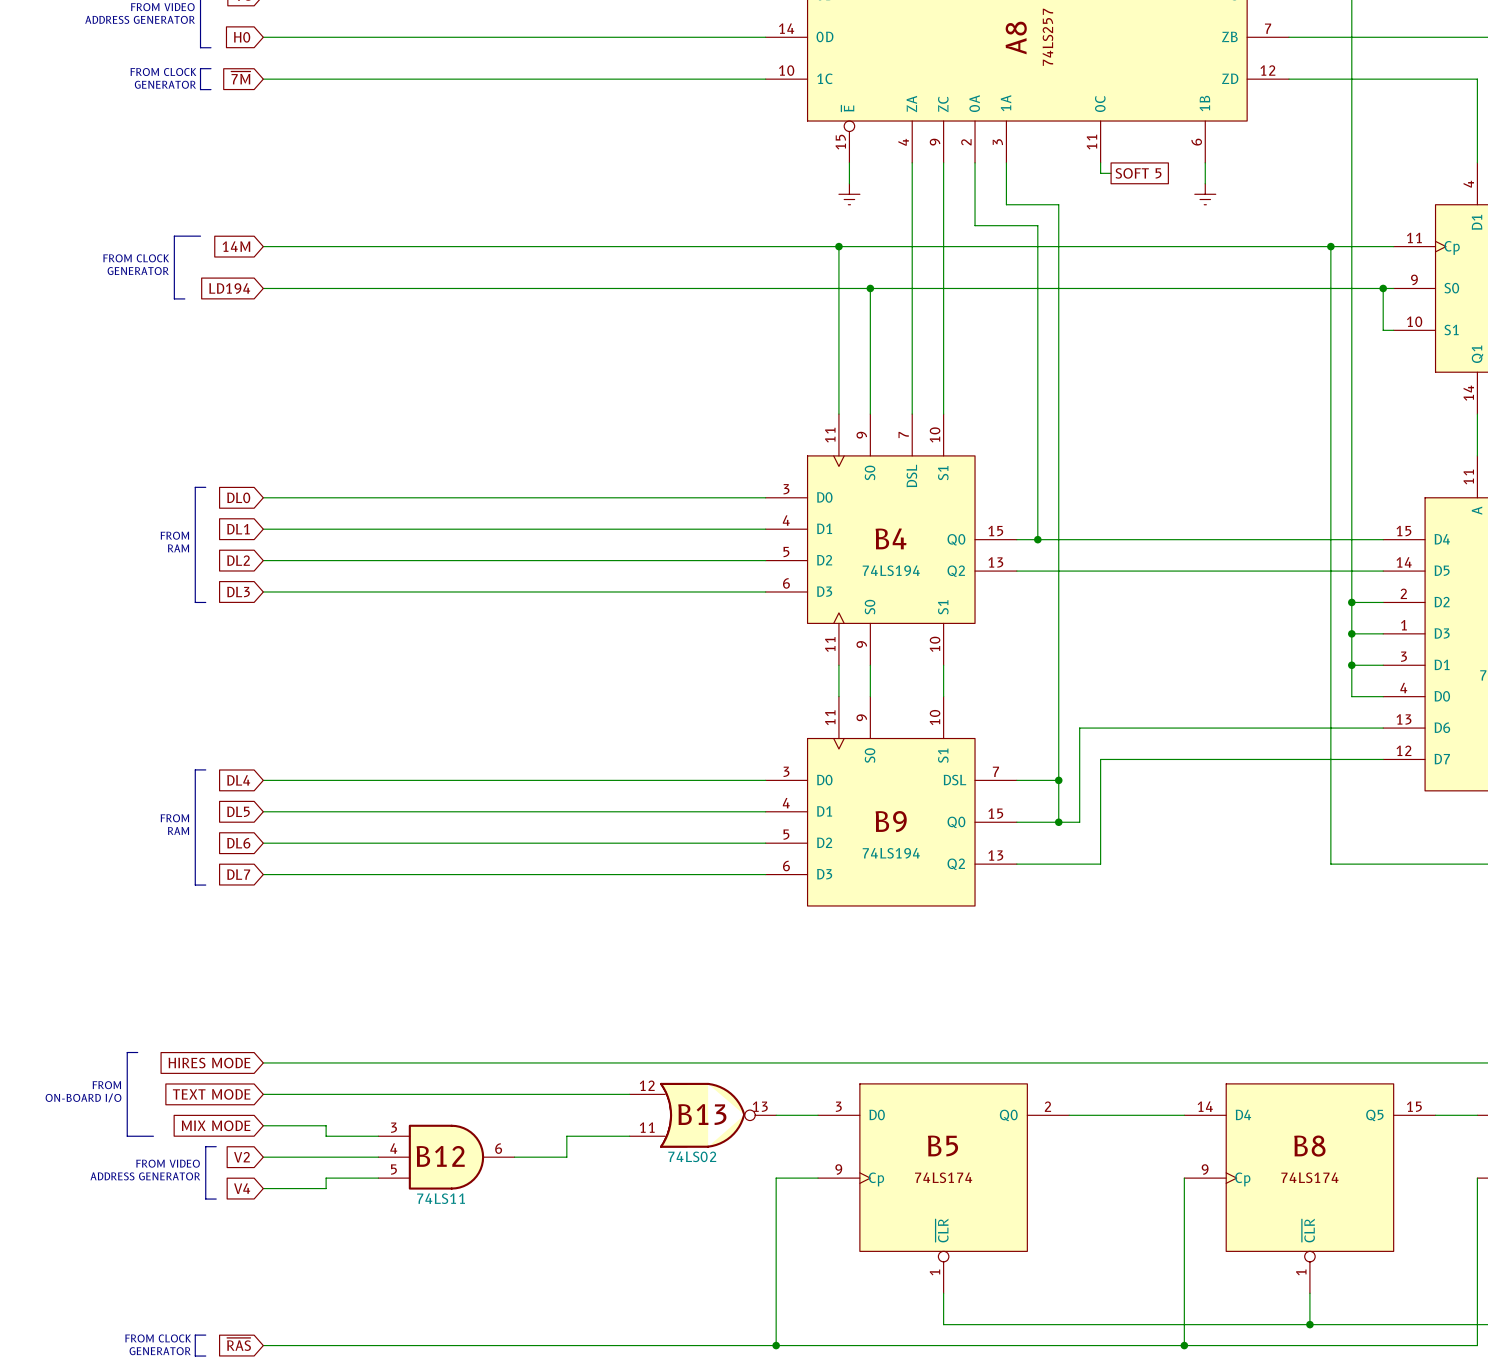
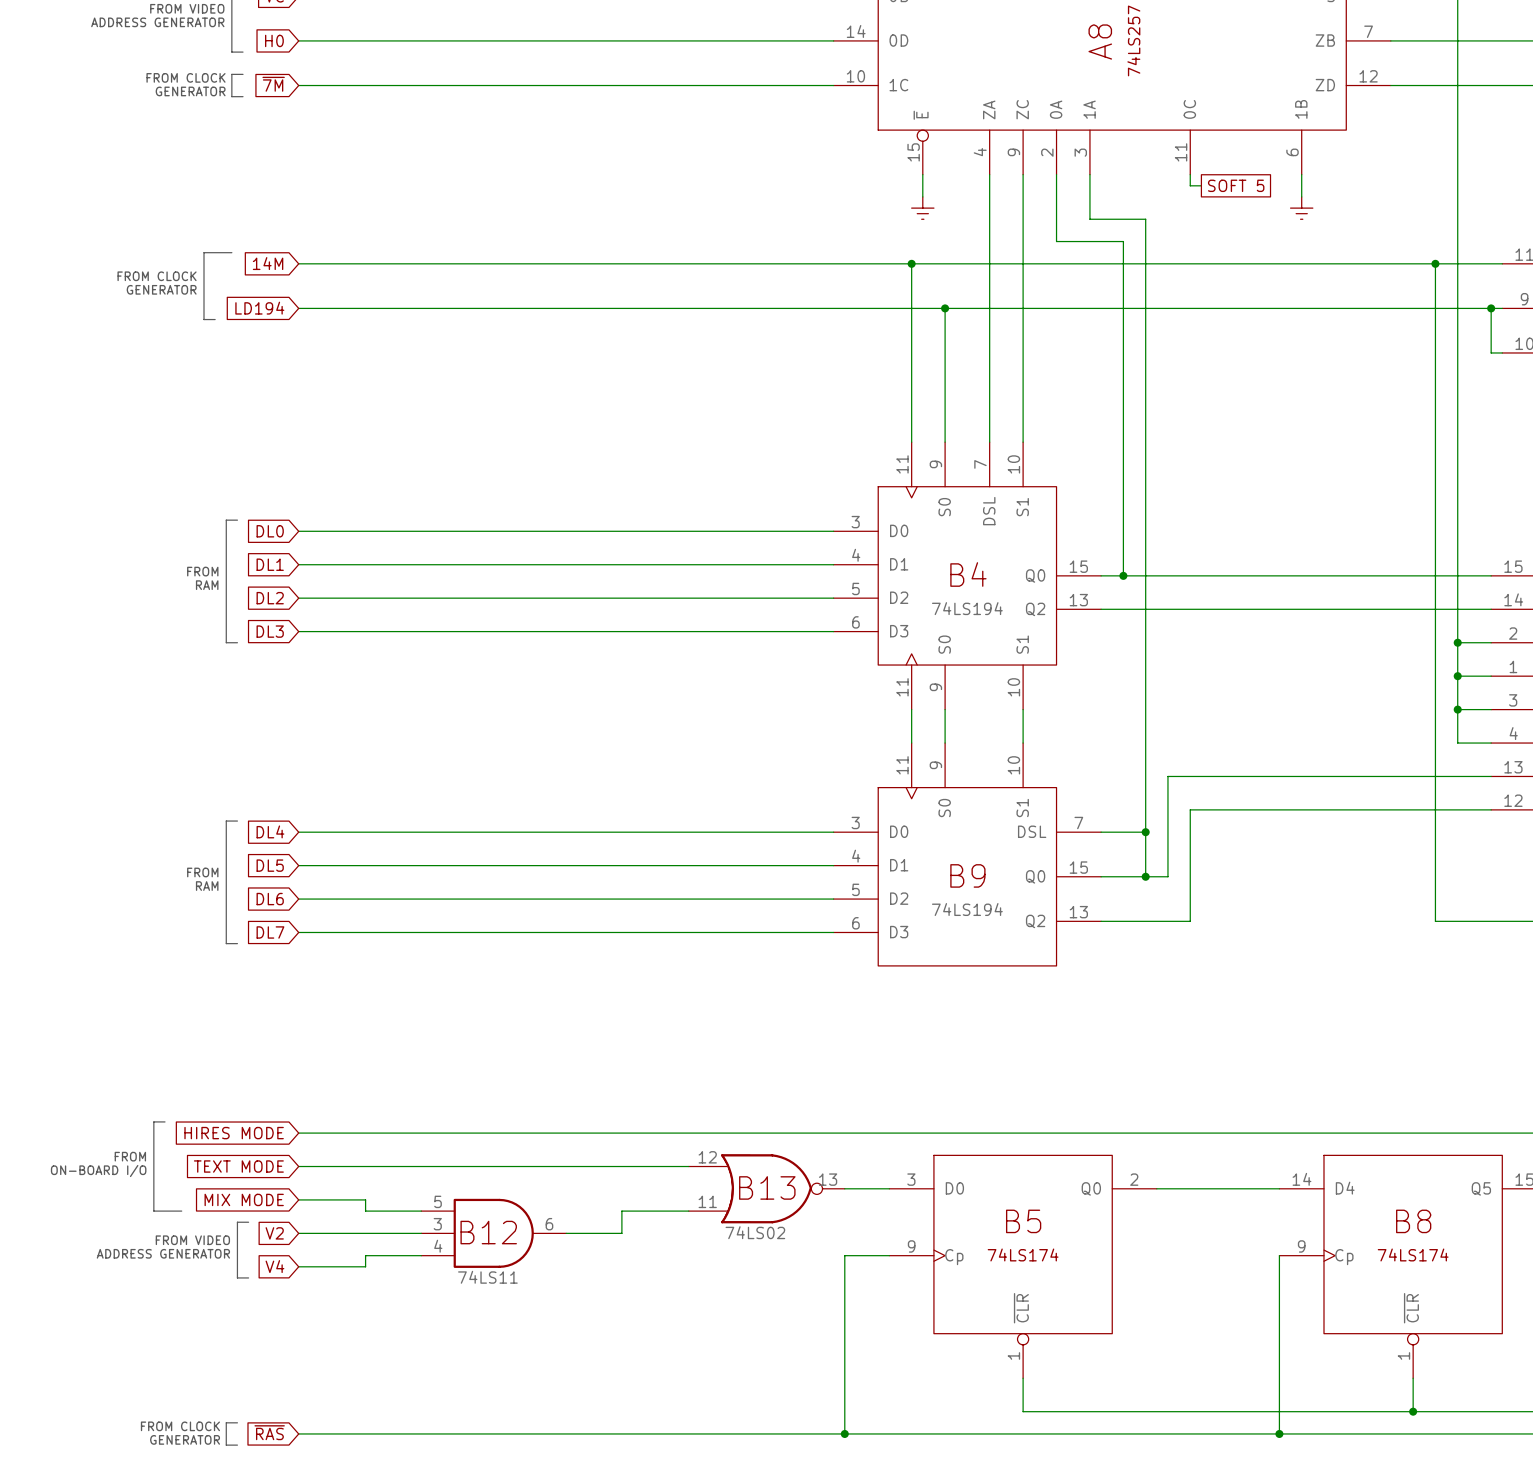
part pin number: 3 (393, 1127) -> 5 (438, 1201)
part pin number: 4 (393, 1148) -> 3 (437, 1224)
part pin number: 5 (393, 1169) -> 4 (438, 1246)

